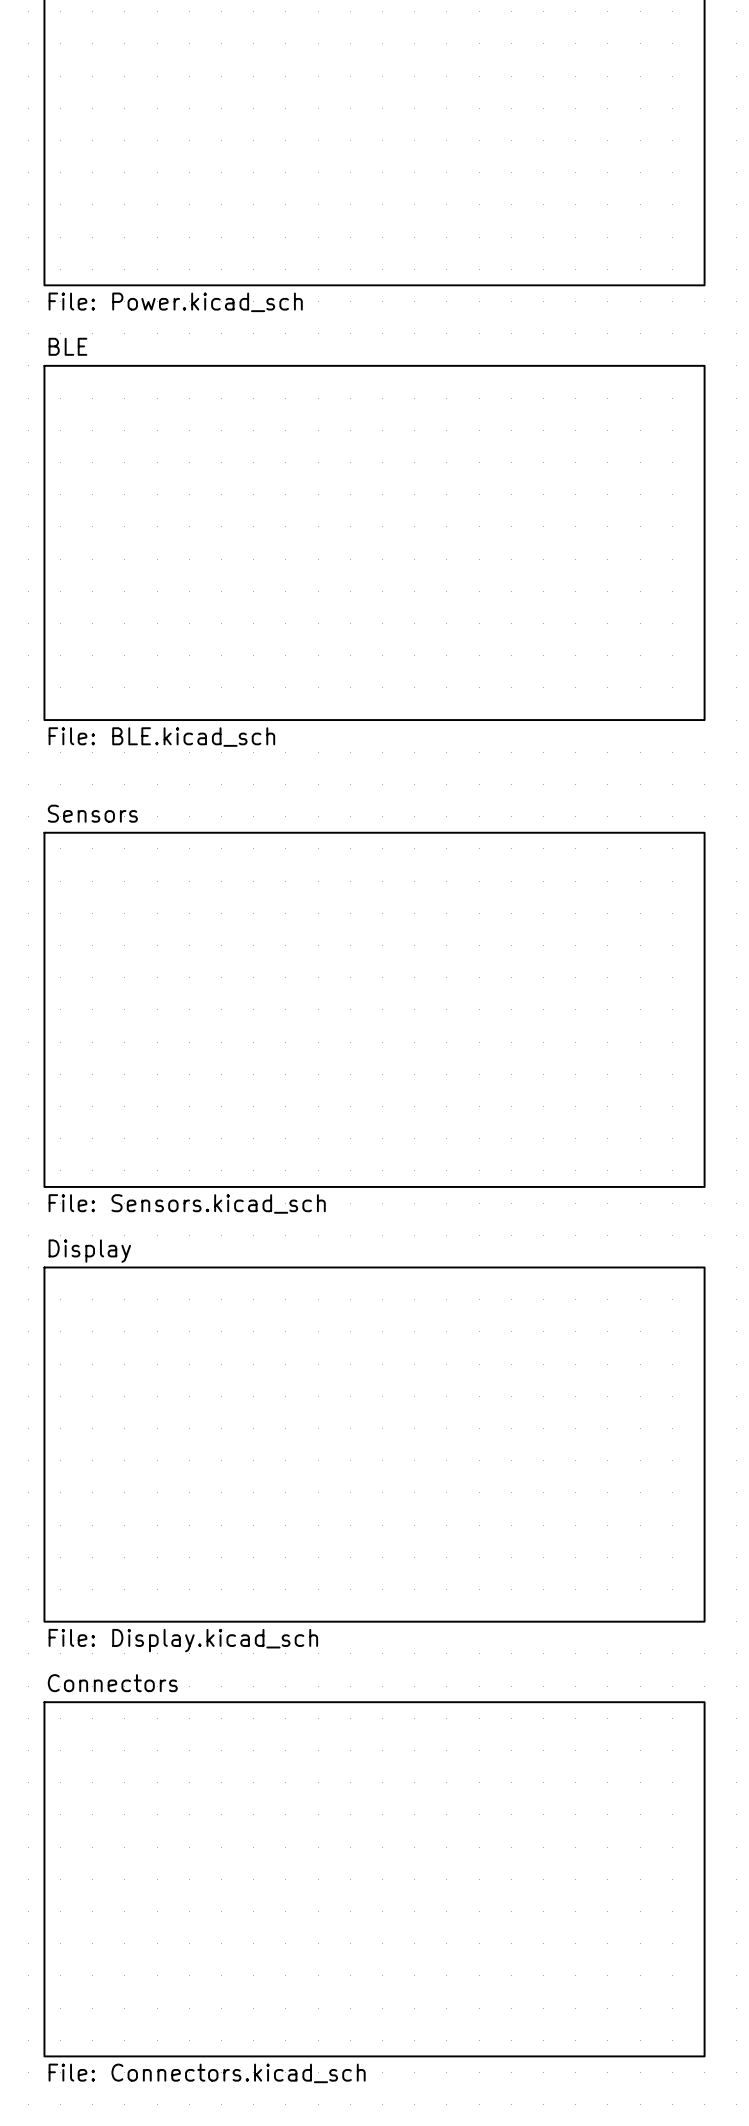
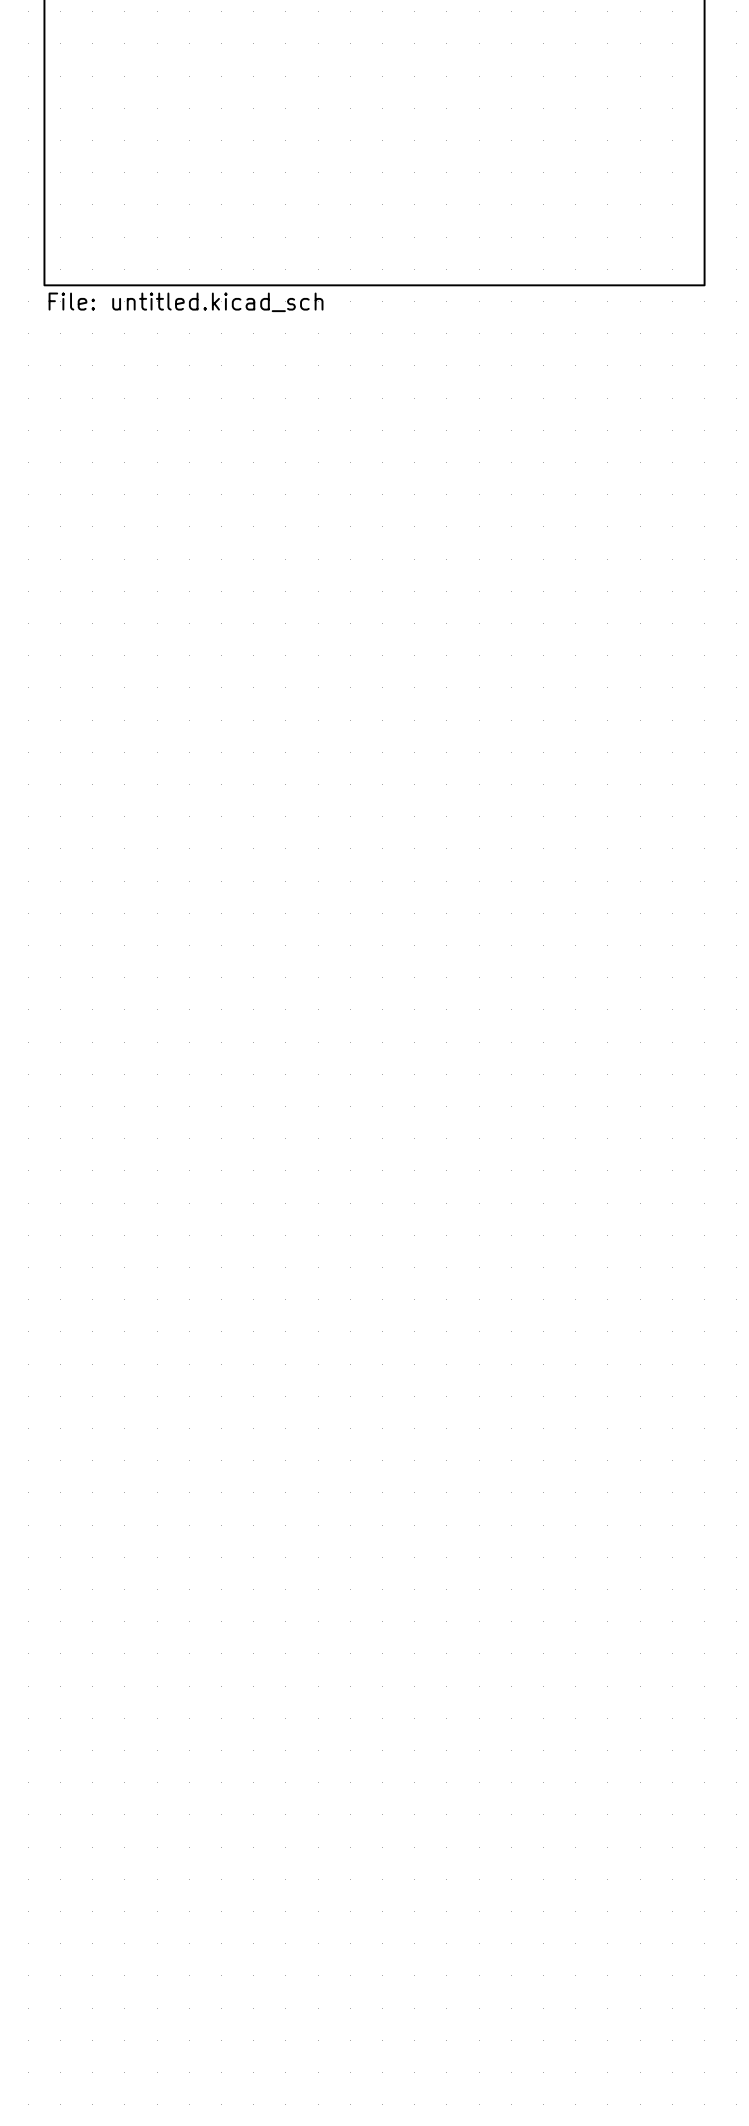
sheet value: File: Power.kicad_sch (175, 302) -> File: untitled.kicad_sch (186, 302)
sheet BLE: File: BLE.kicad_sch (374, 542) -> none
sheet Sensors: File: Sensors.kicad_sch (374, 1009) -> none
sheet Display: File: Display.kicad_sch (374, 1444) -> none
sheet Connectors: File: Connectors.kicad_sch (374, 1879) -> none

